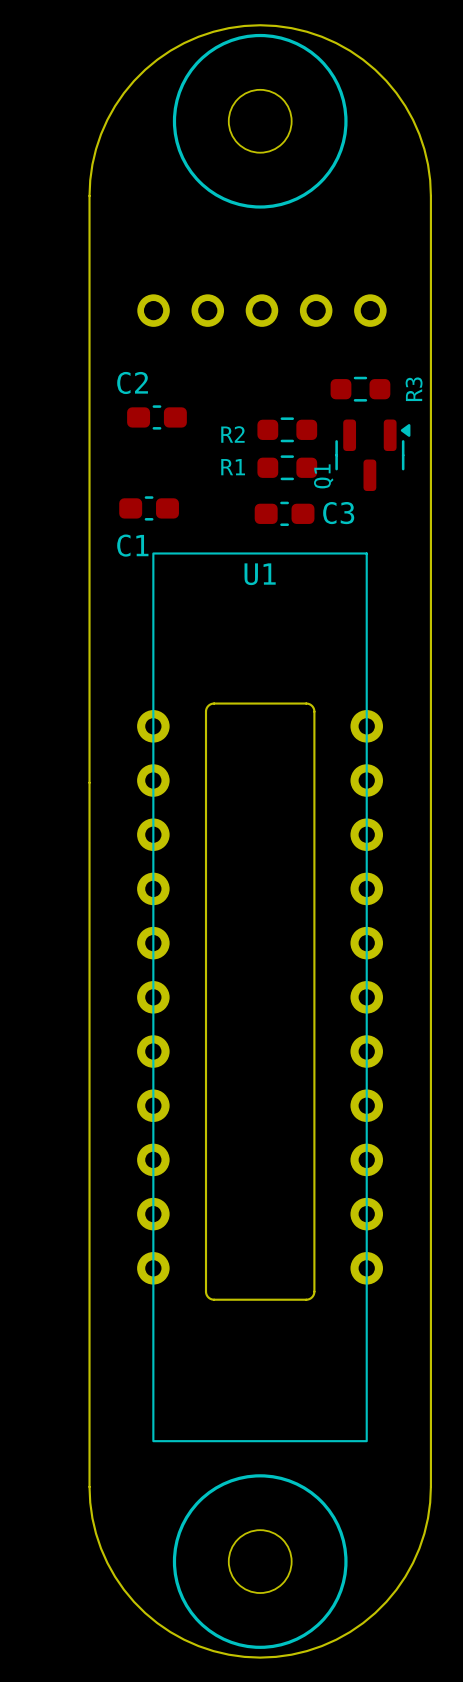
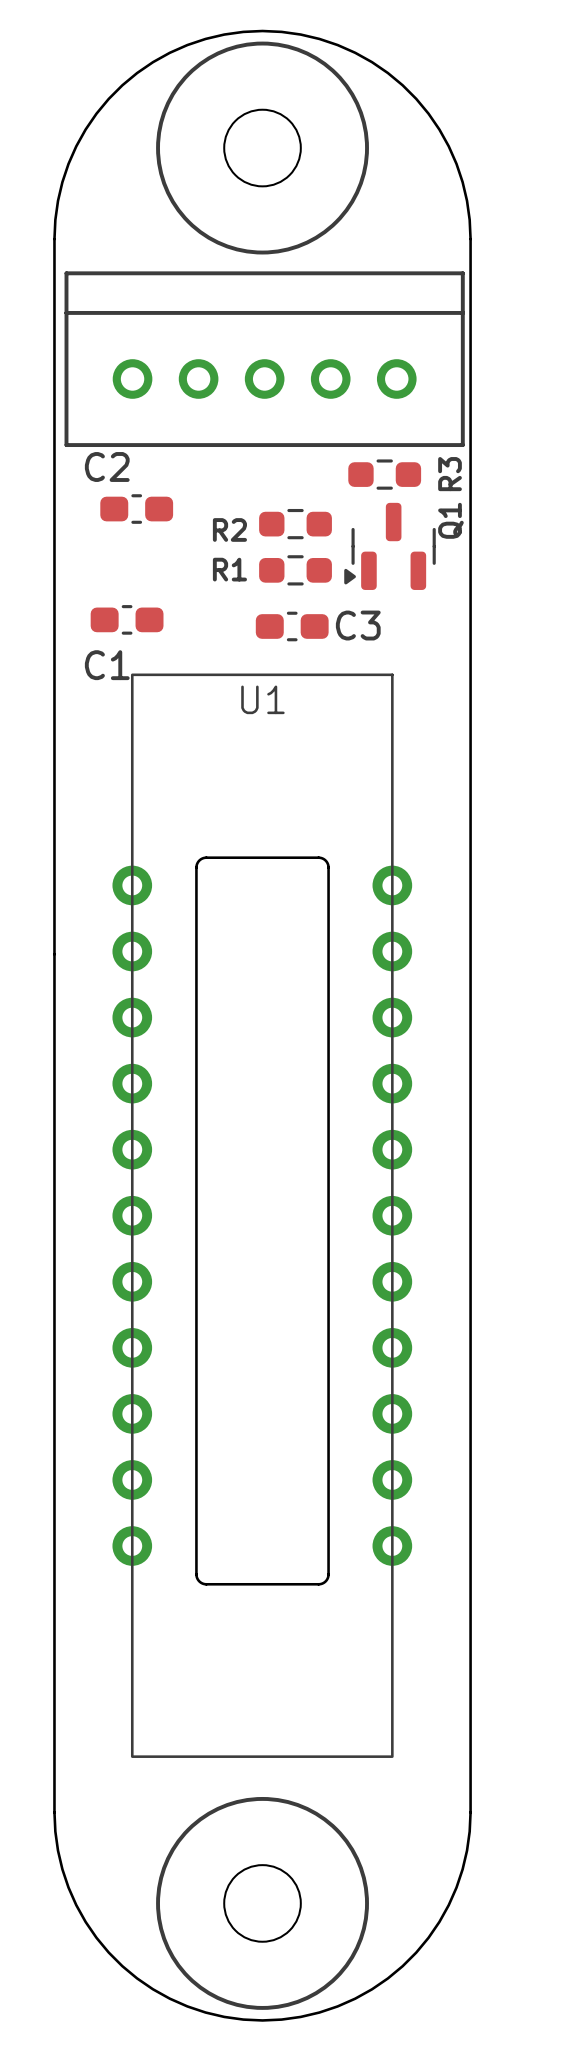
part side: bottom (261, 310) -> top (264, 359)
Q1 rotation: 0° (372, 455) -> 180° (390, 546)

